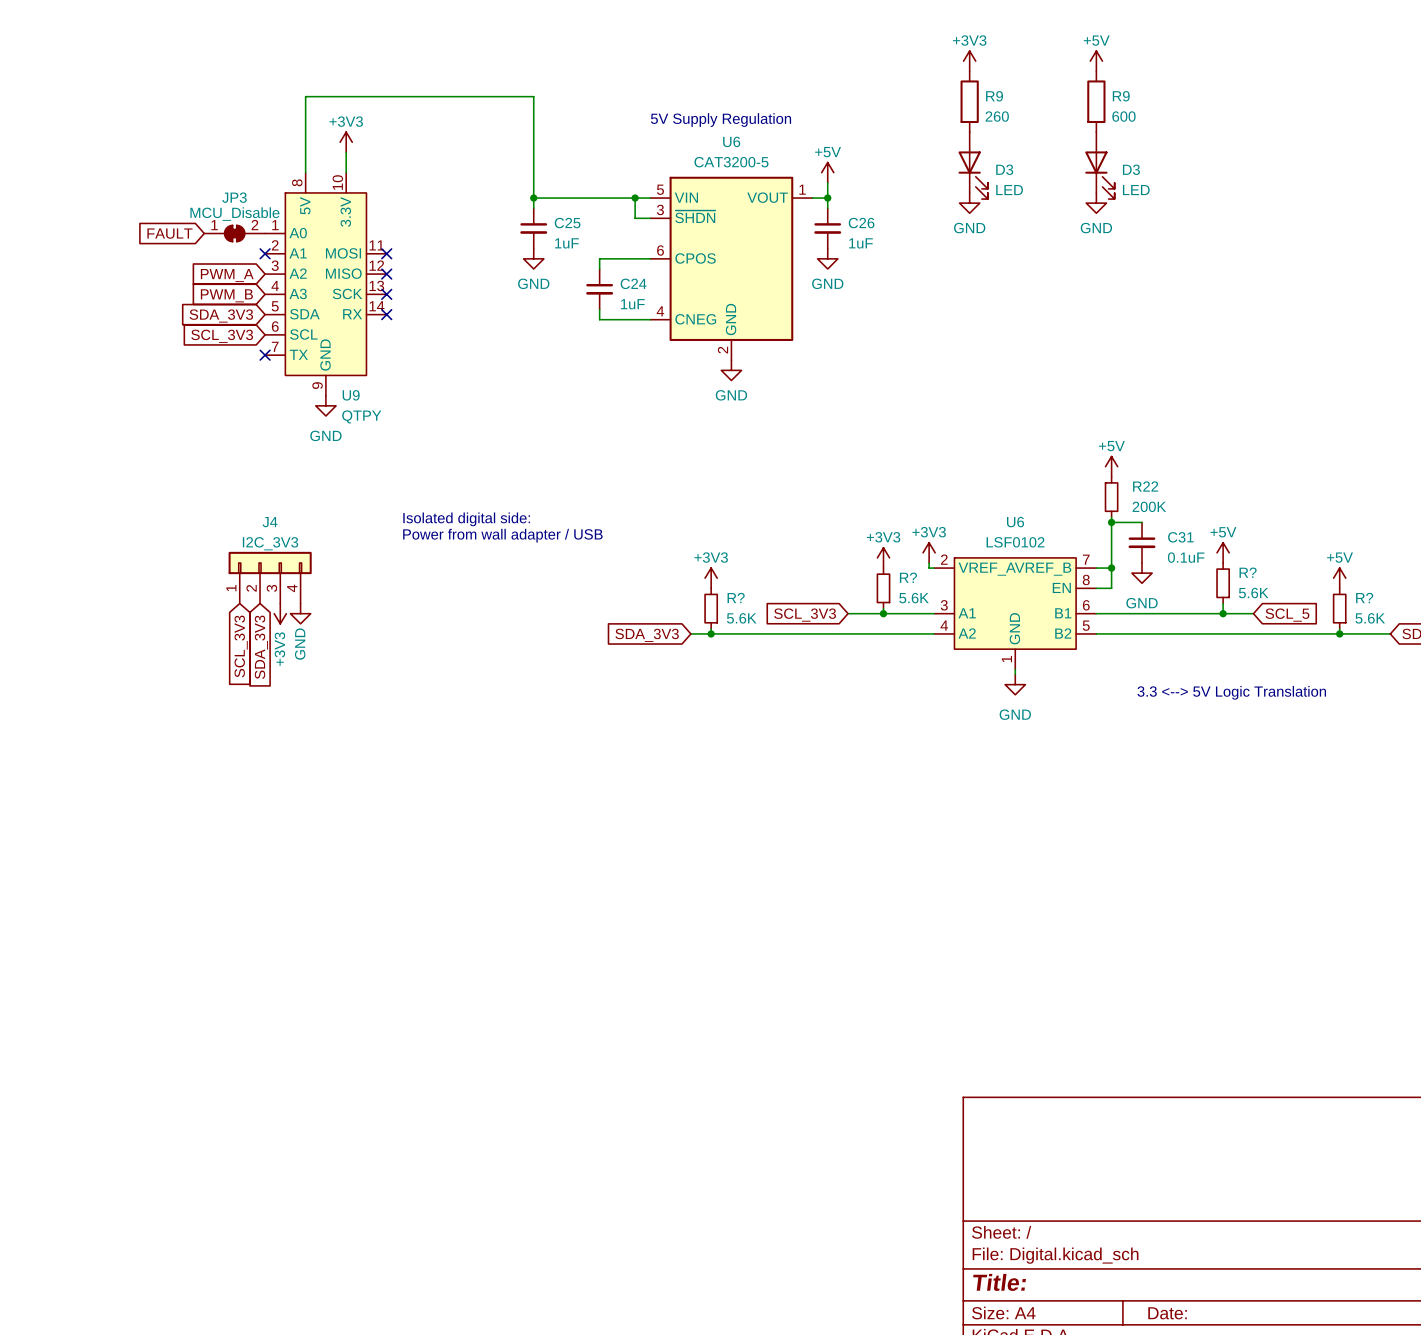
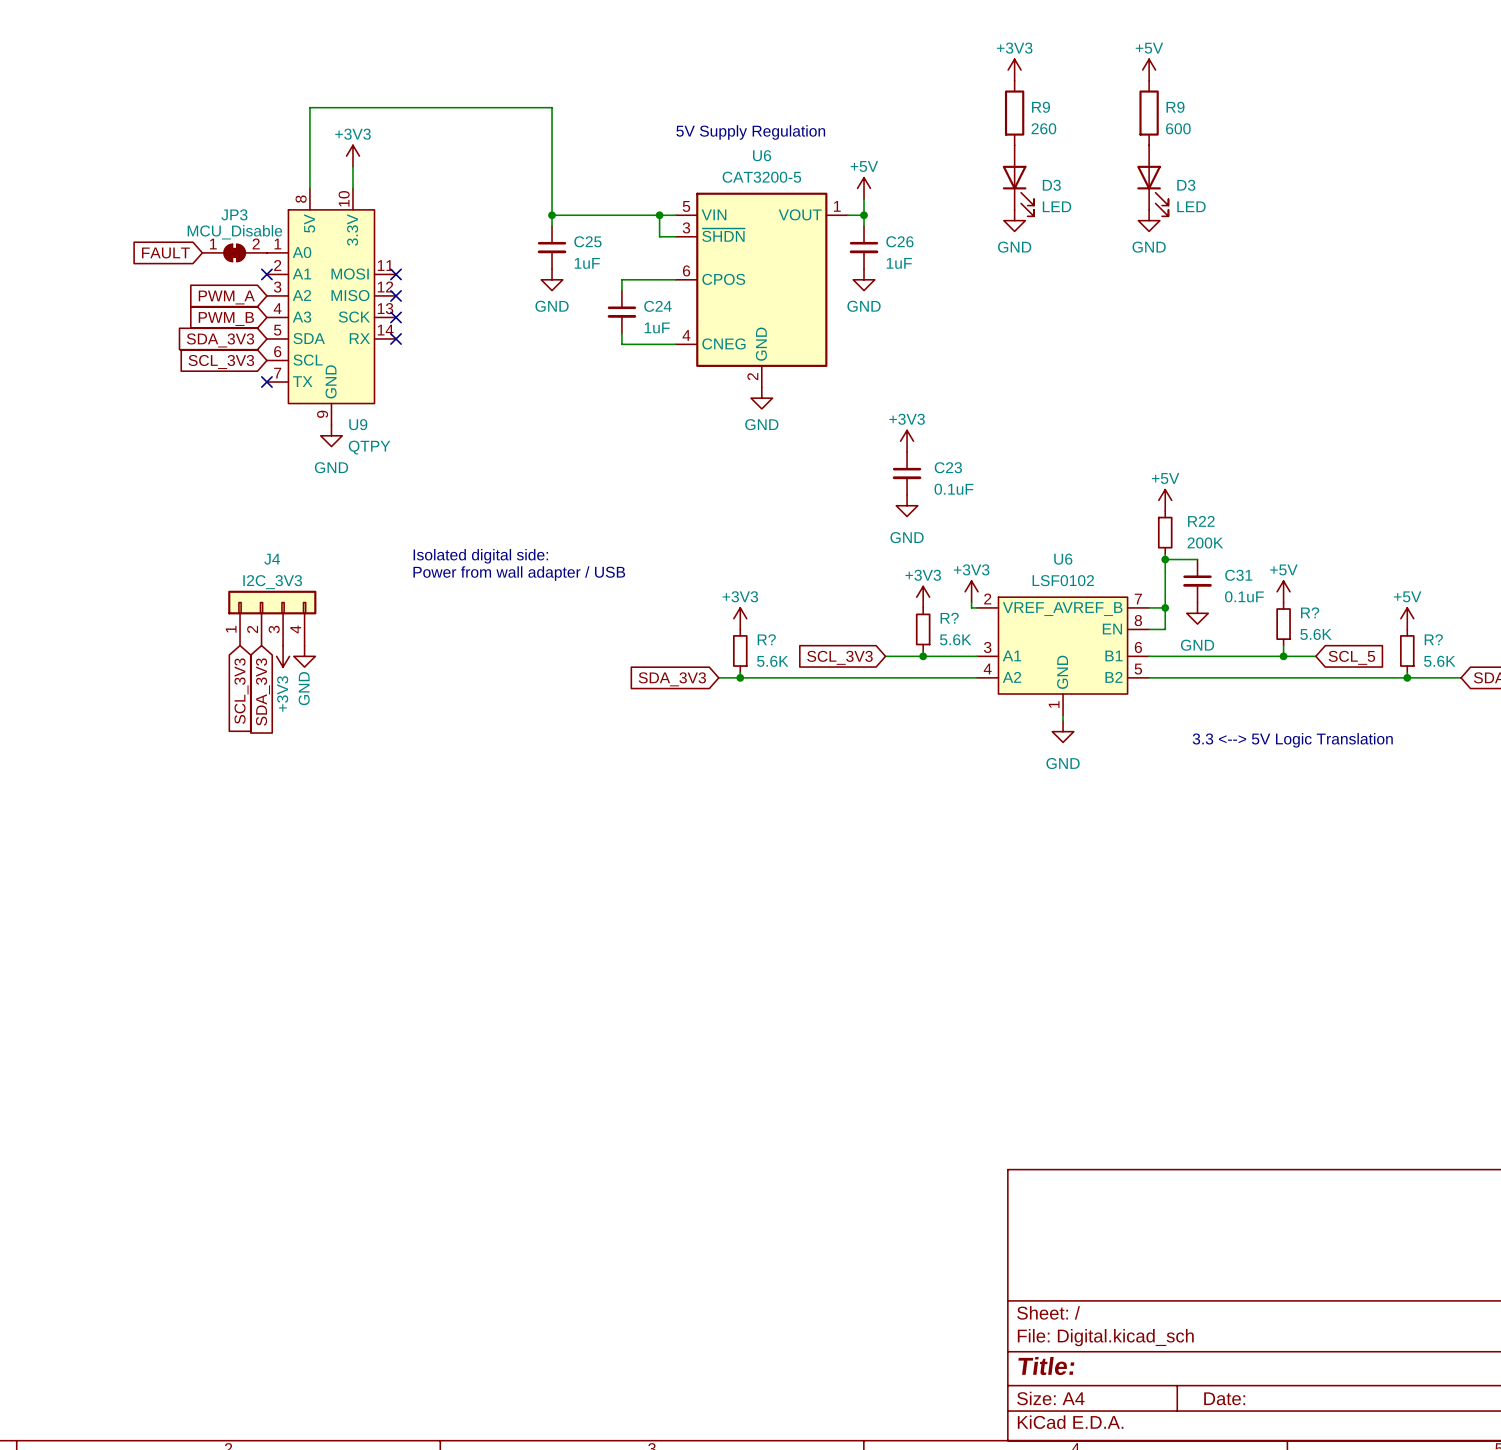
power symbol: none -> +3V3 (907, 441)
C23: none -> 0.1uF (907, 473)
power symbol: none -> GND (907, 505)

